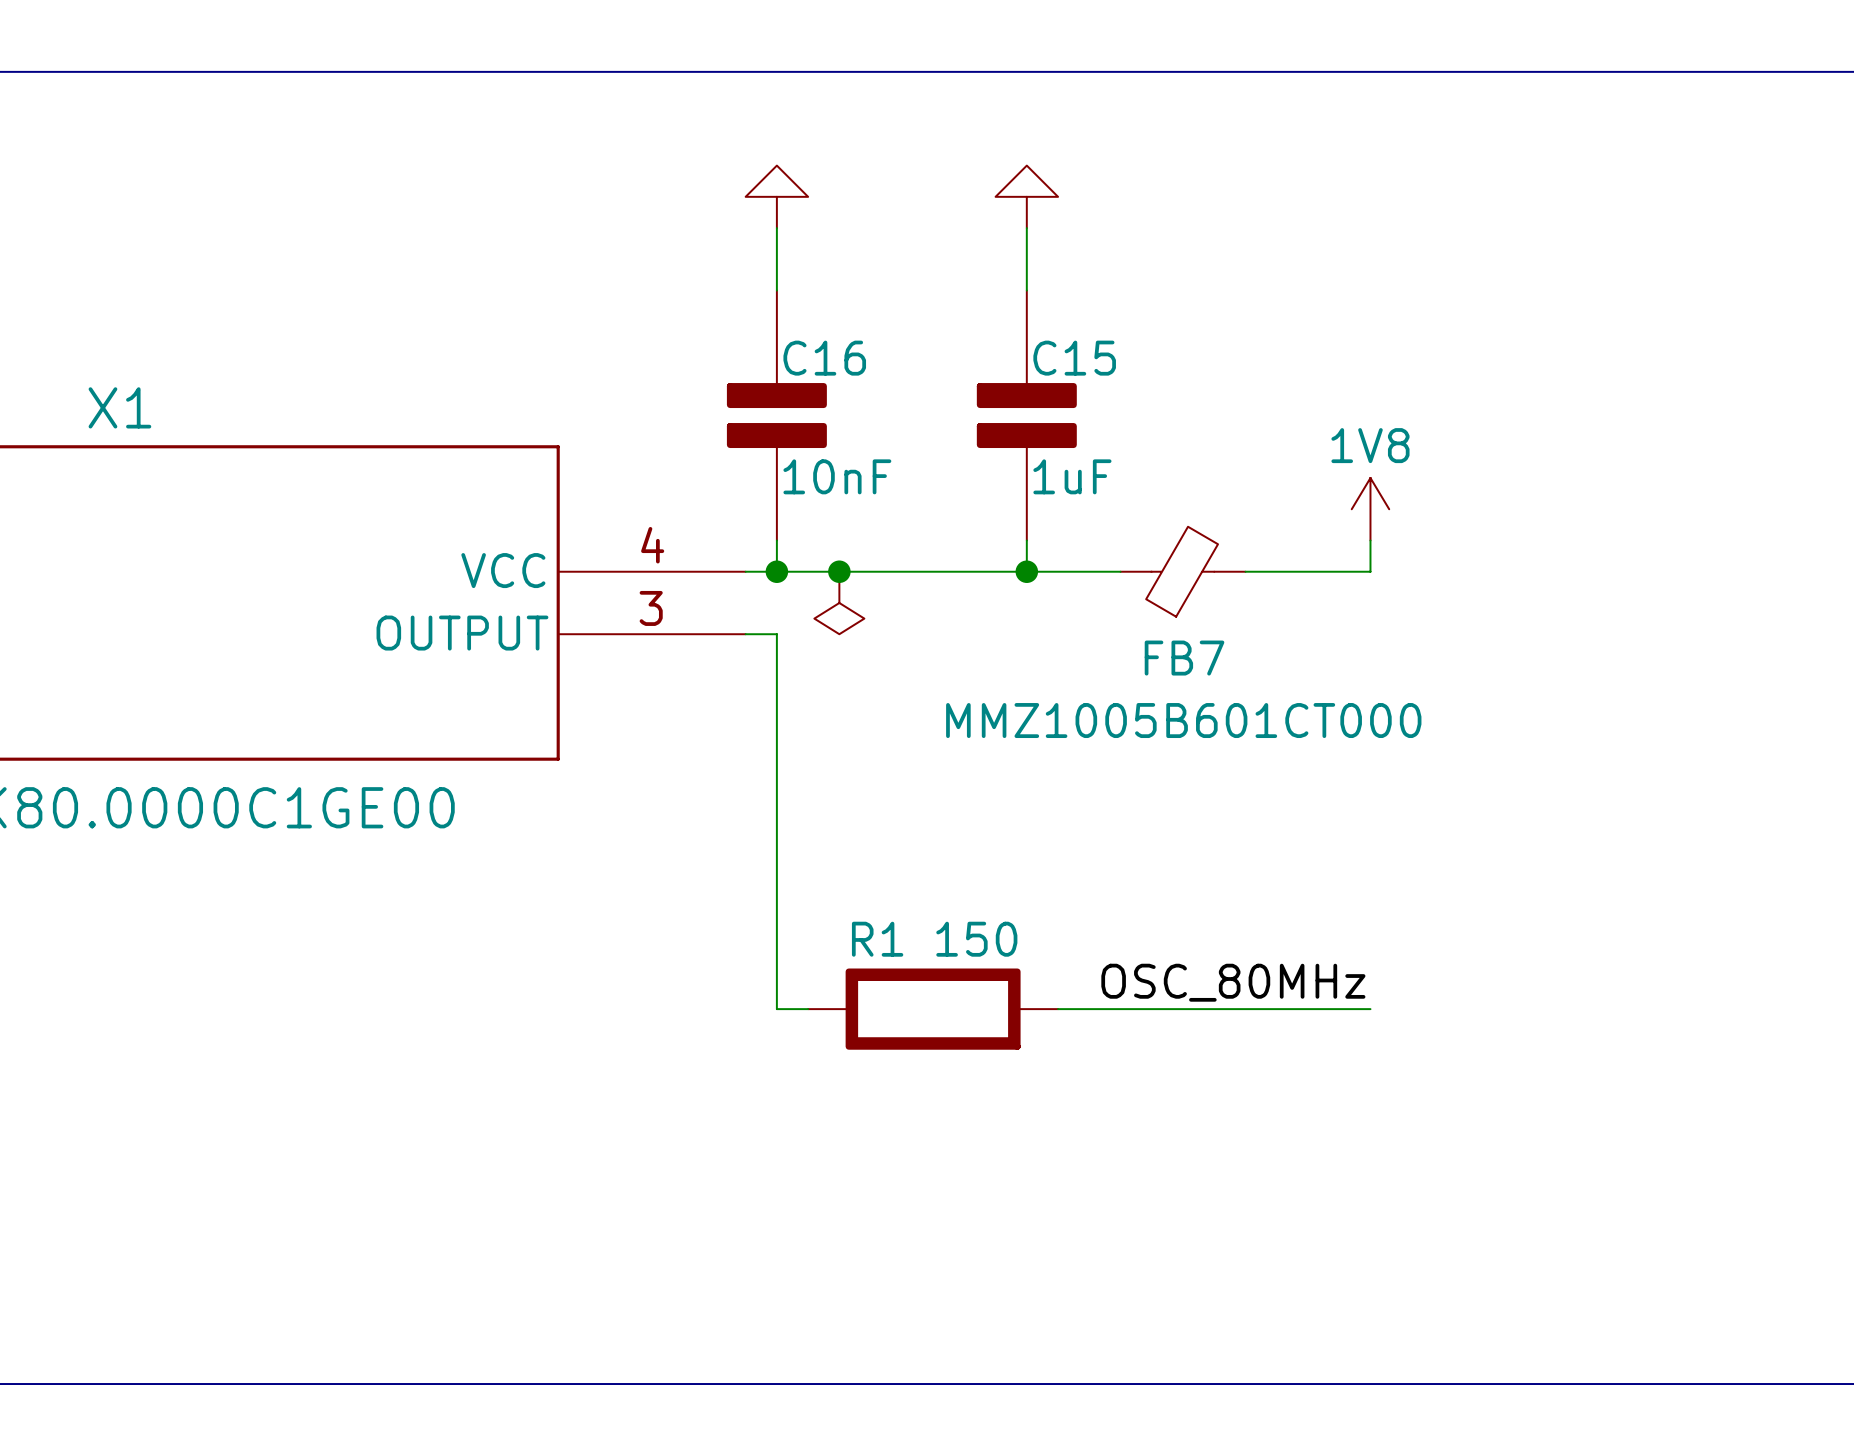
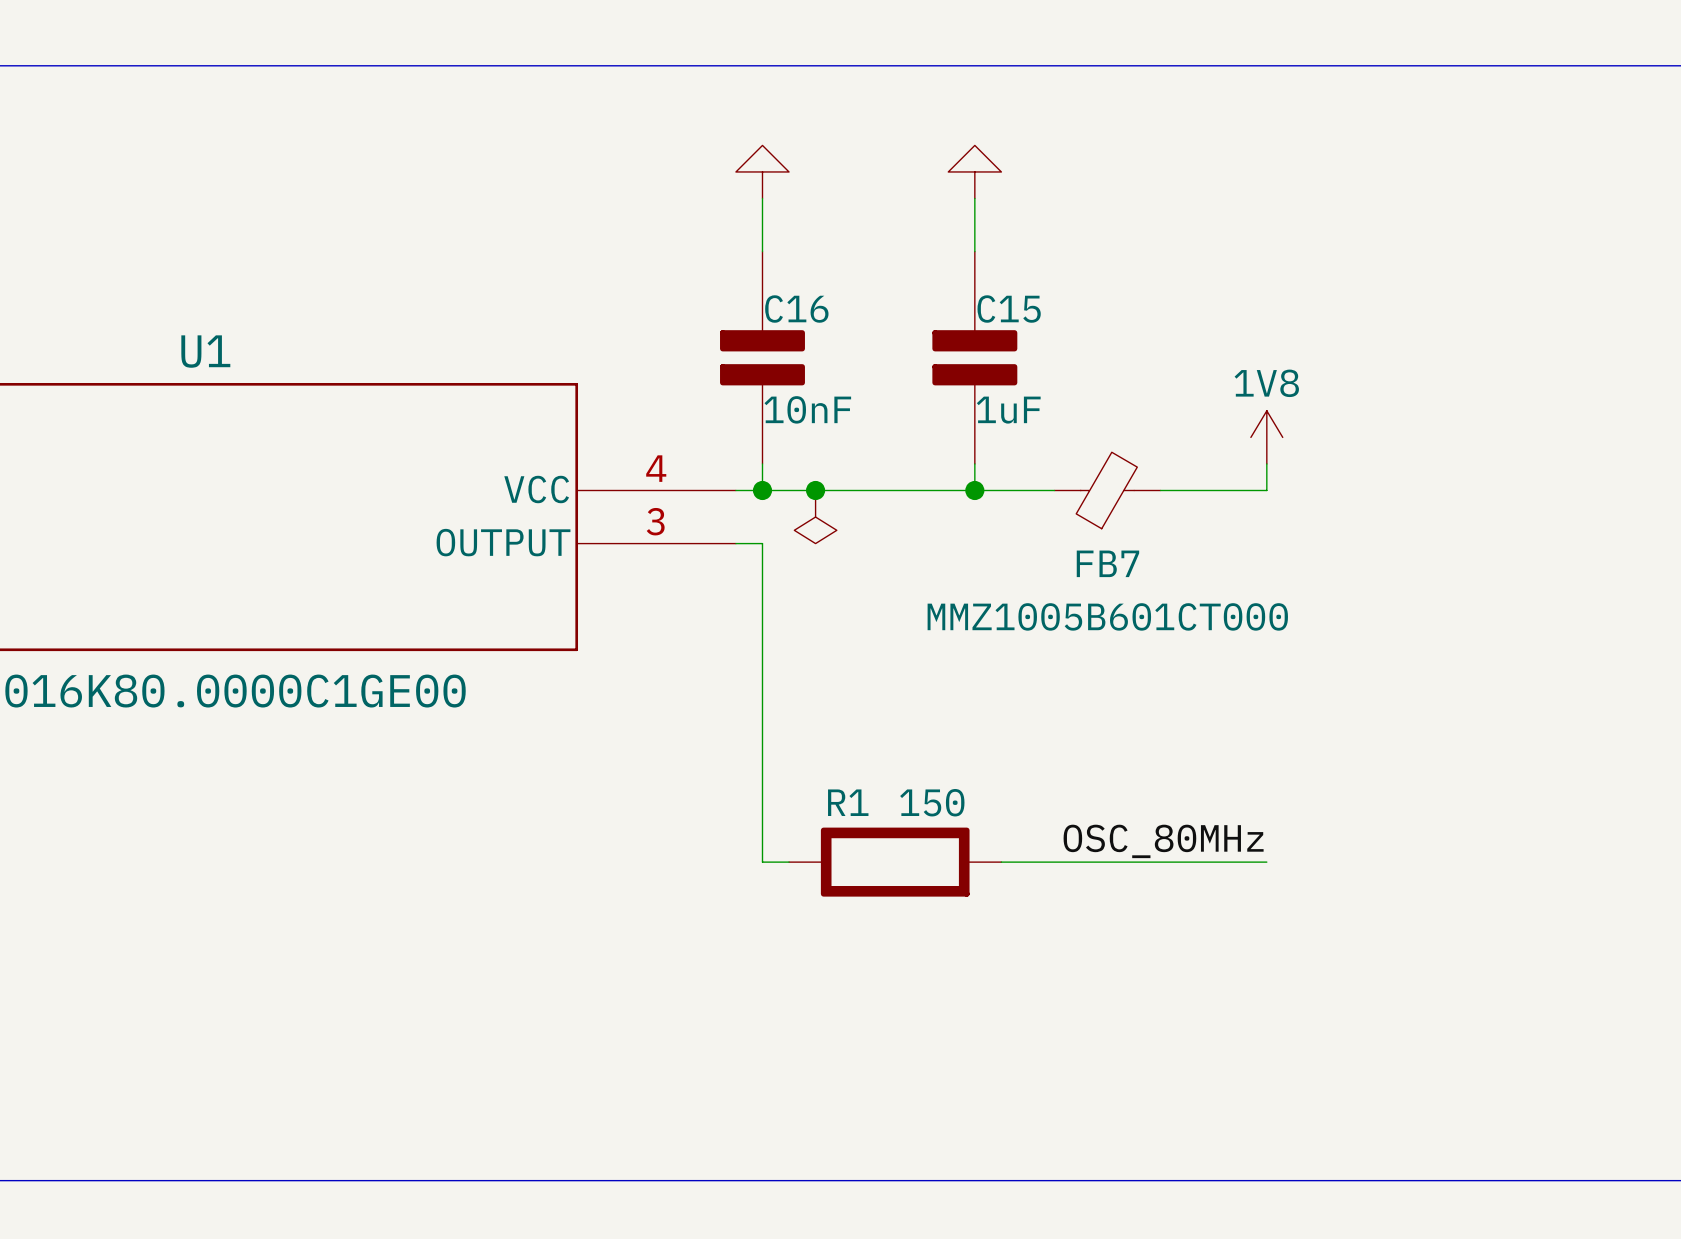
X1 name: X1 (119, 407) -> U1 (205, 351)

